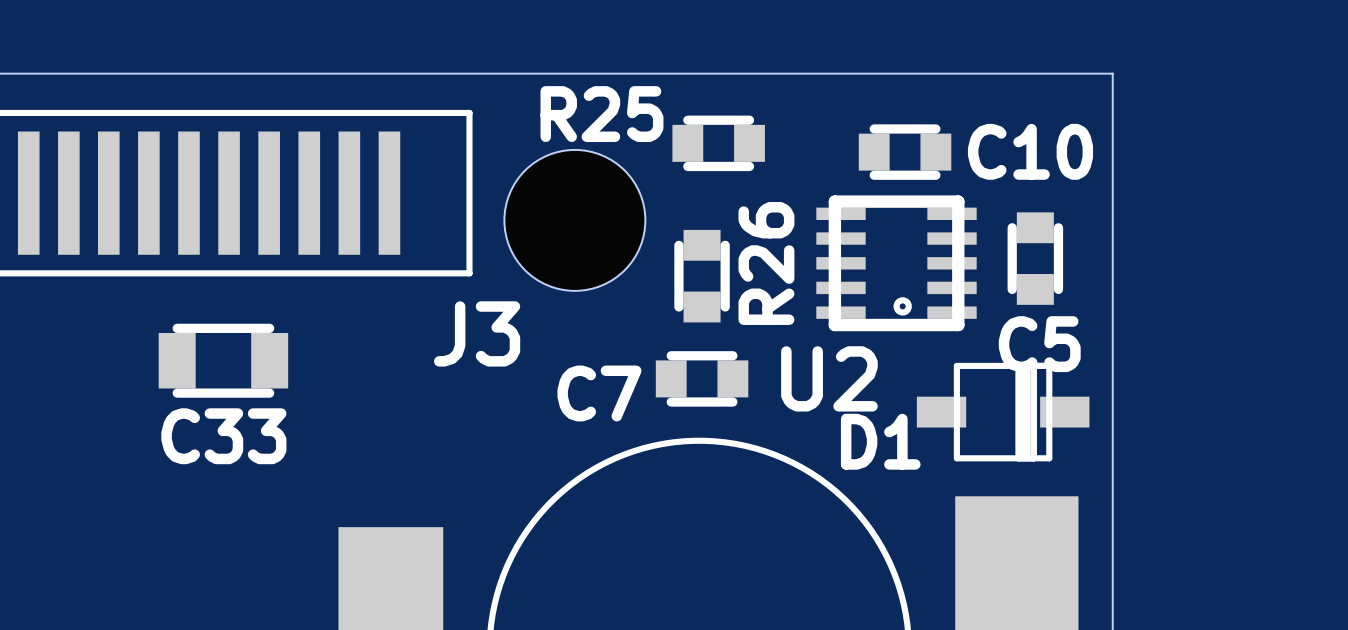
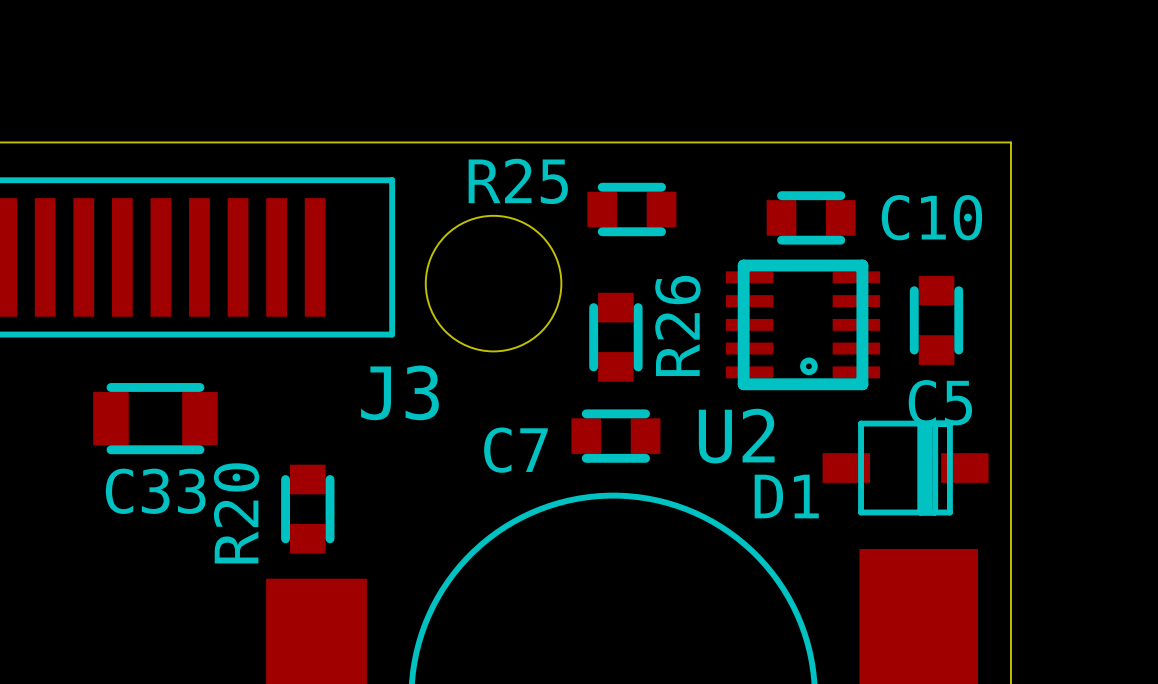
R20: none -> (307, 509)

